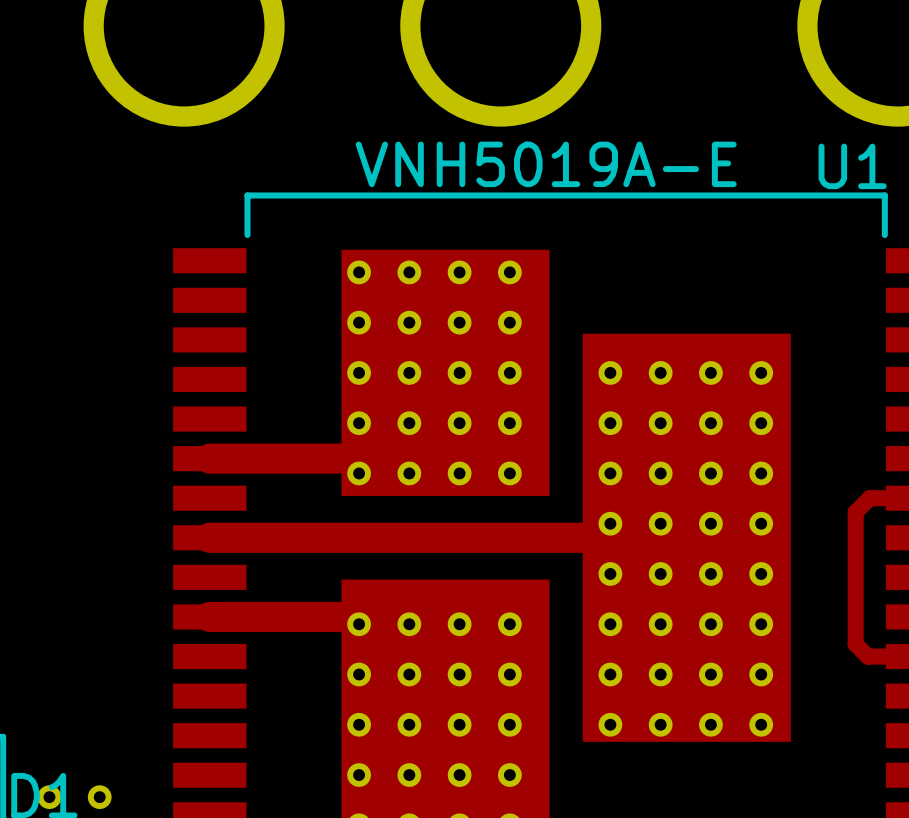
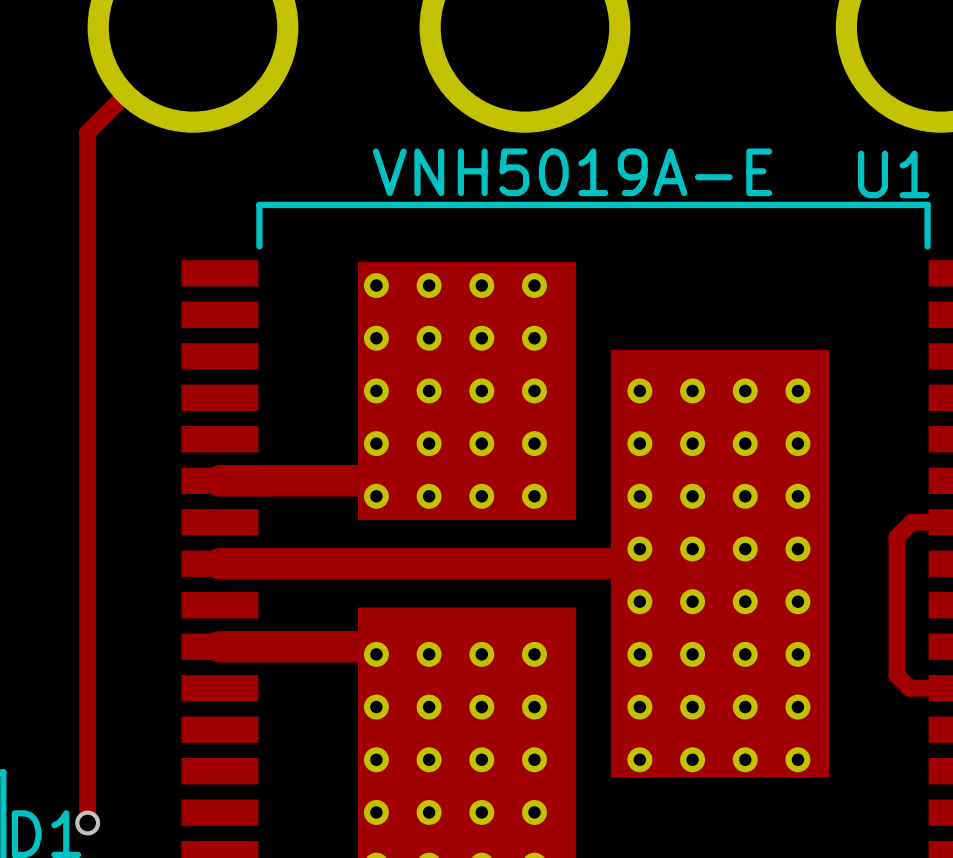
track: none -> (193, 27) (87, 132) (87, 822)
via: none -> (87, 823)
part: (49, 797) -> none
part: (99, 797) -> none

